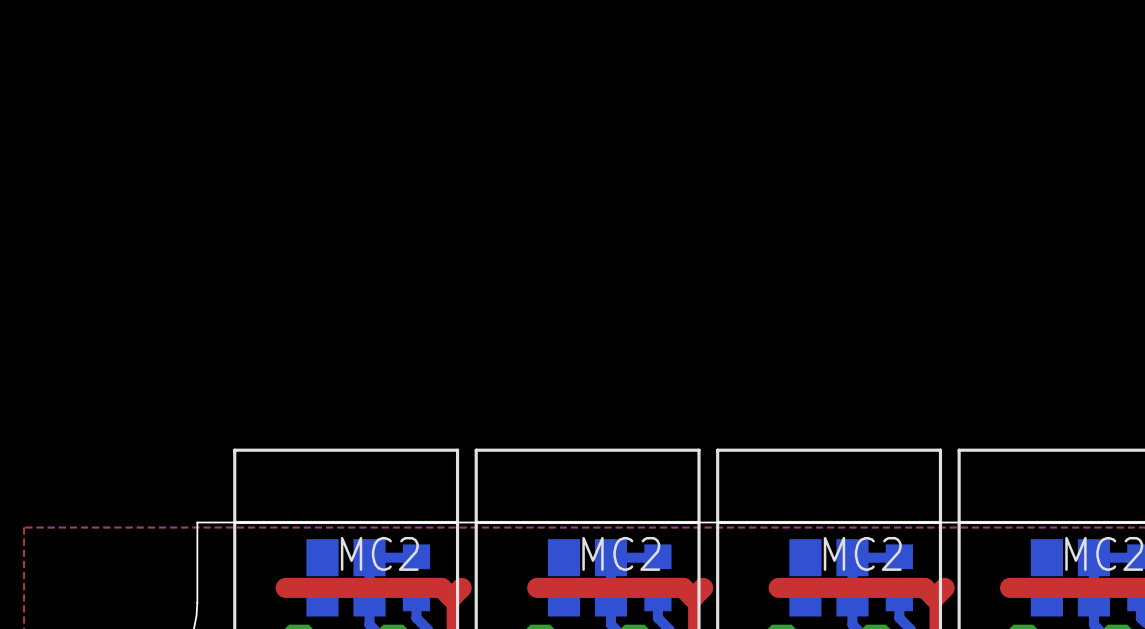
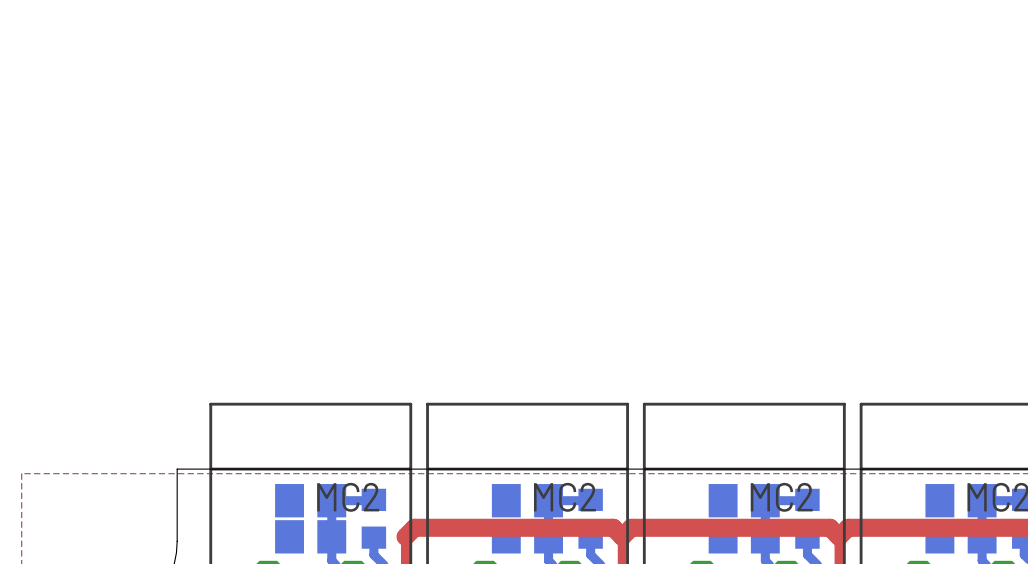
top track: (285, 587) (441, 587) (451, 597) -> none
top track: none -> (414, 527) (482, 527)
top track: none -> (631, 527) (699, 527)
top track: none -> (848, 527) (906, 527)

